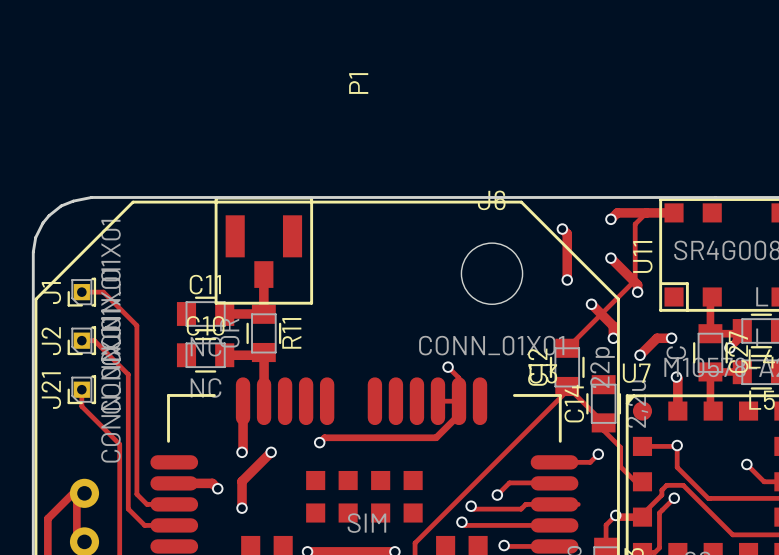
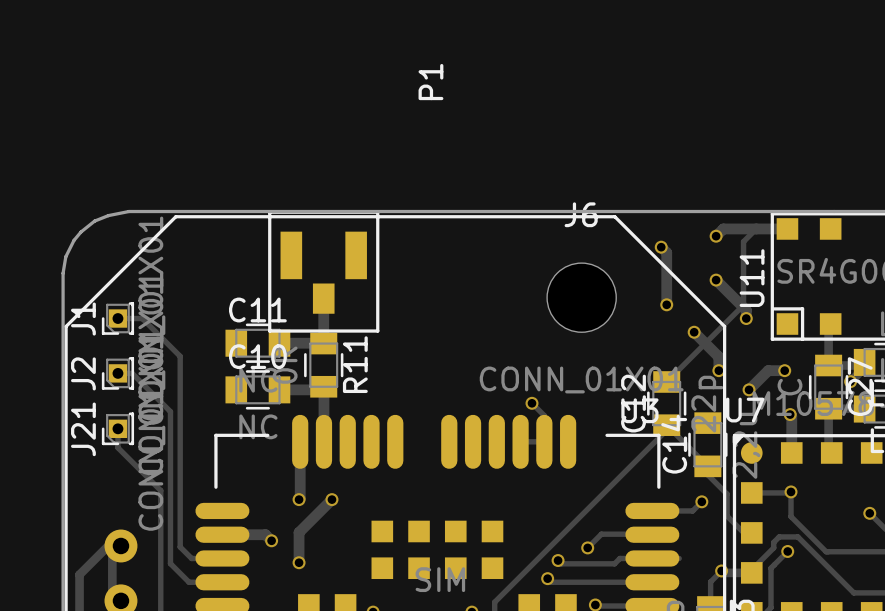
track: (459, 401) (459, 414) (436, 437) (324, 437) (319, 442) -> none
via: (319, 442) -> none

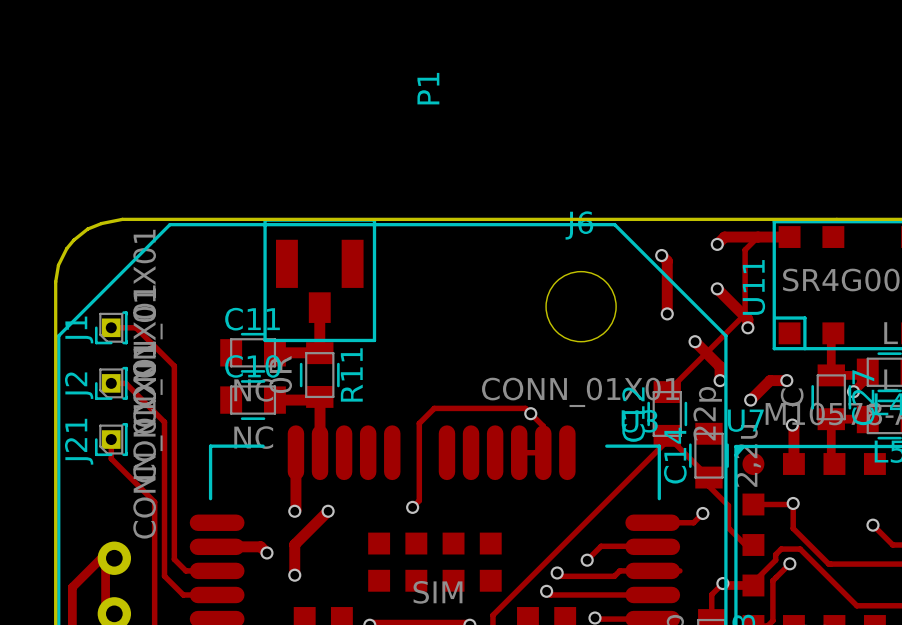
track: none -> (530, 413) (525, 408) (434, 408) (419, 423) (419, 500) (412, 507)
via: none -> (412, 507)

